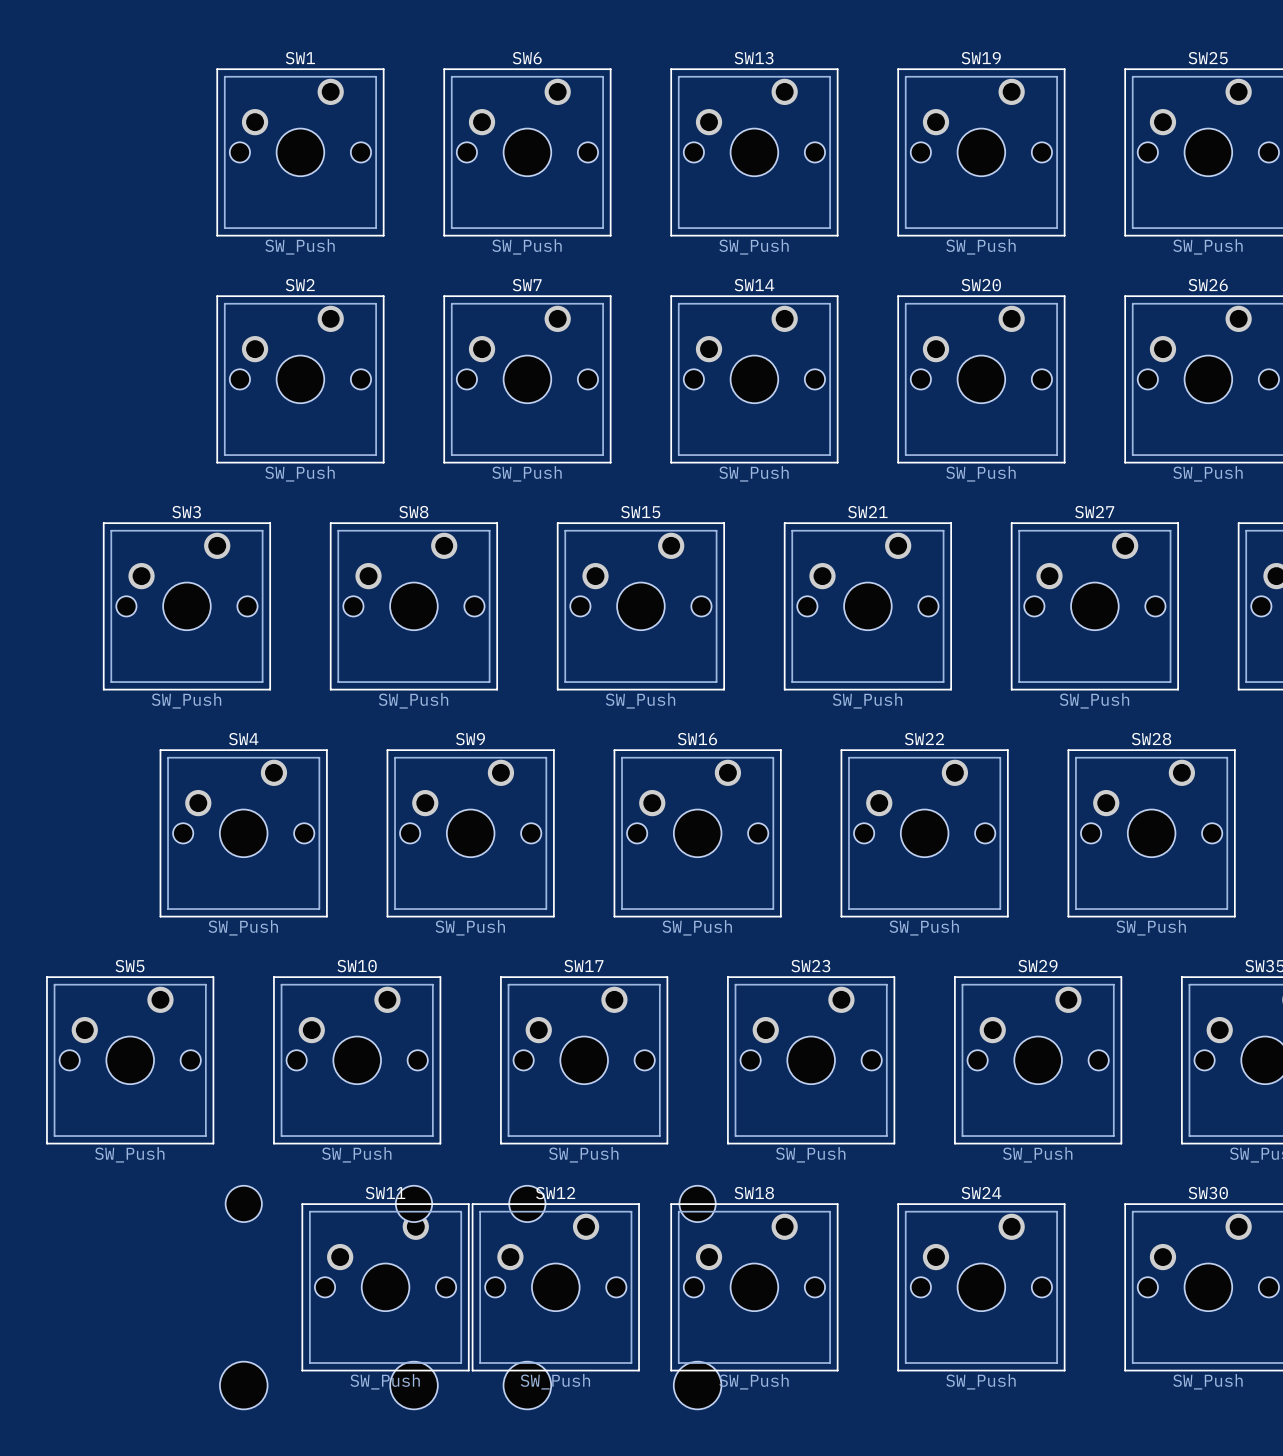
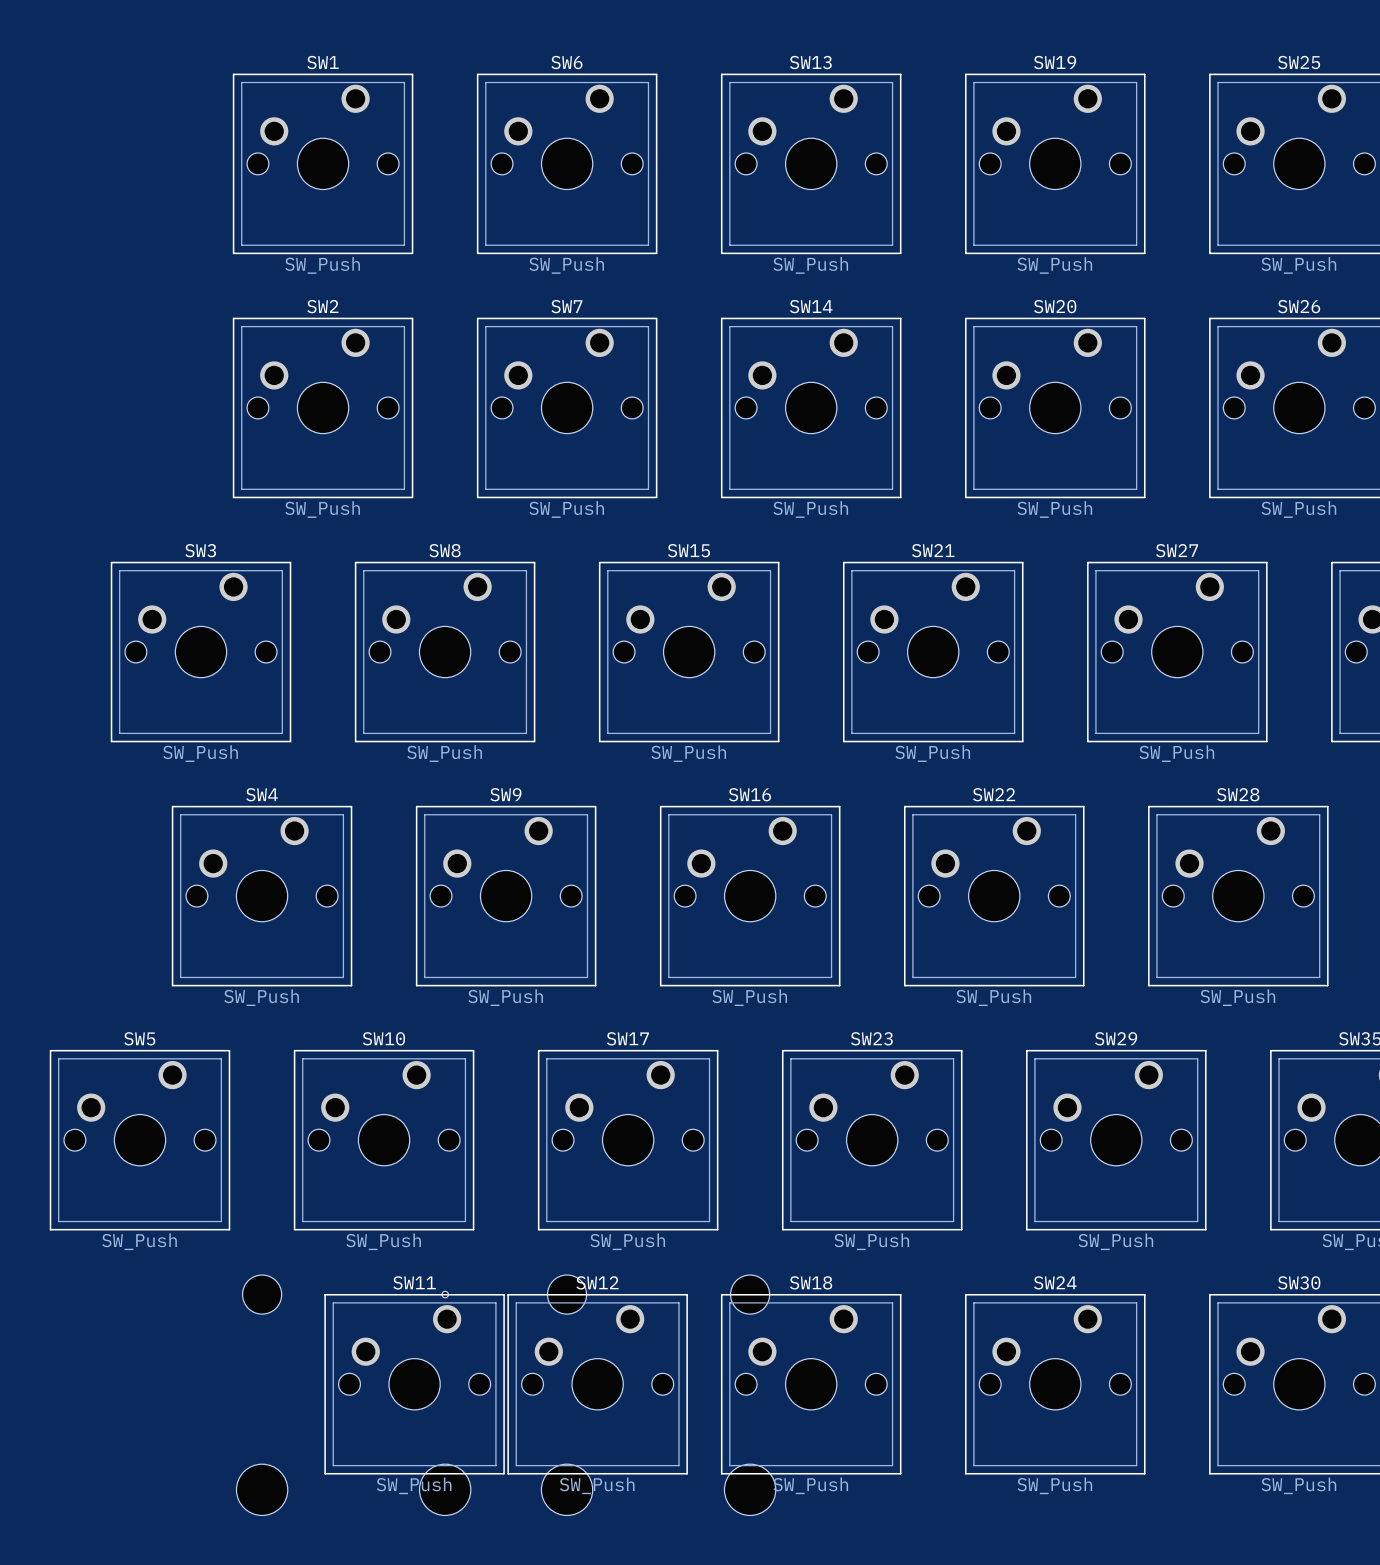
SW12 footprint: [390, 1185, 722, 1410] -> [419, 1275, 776, 1516]

